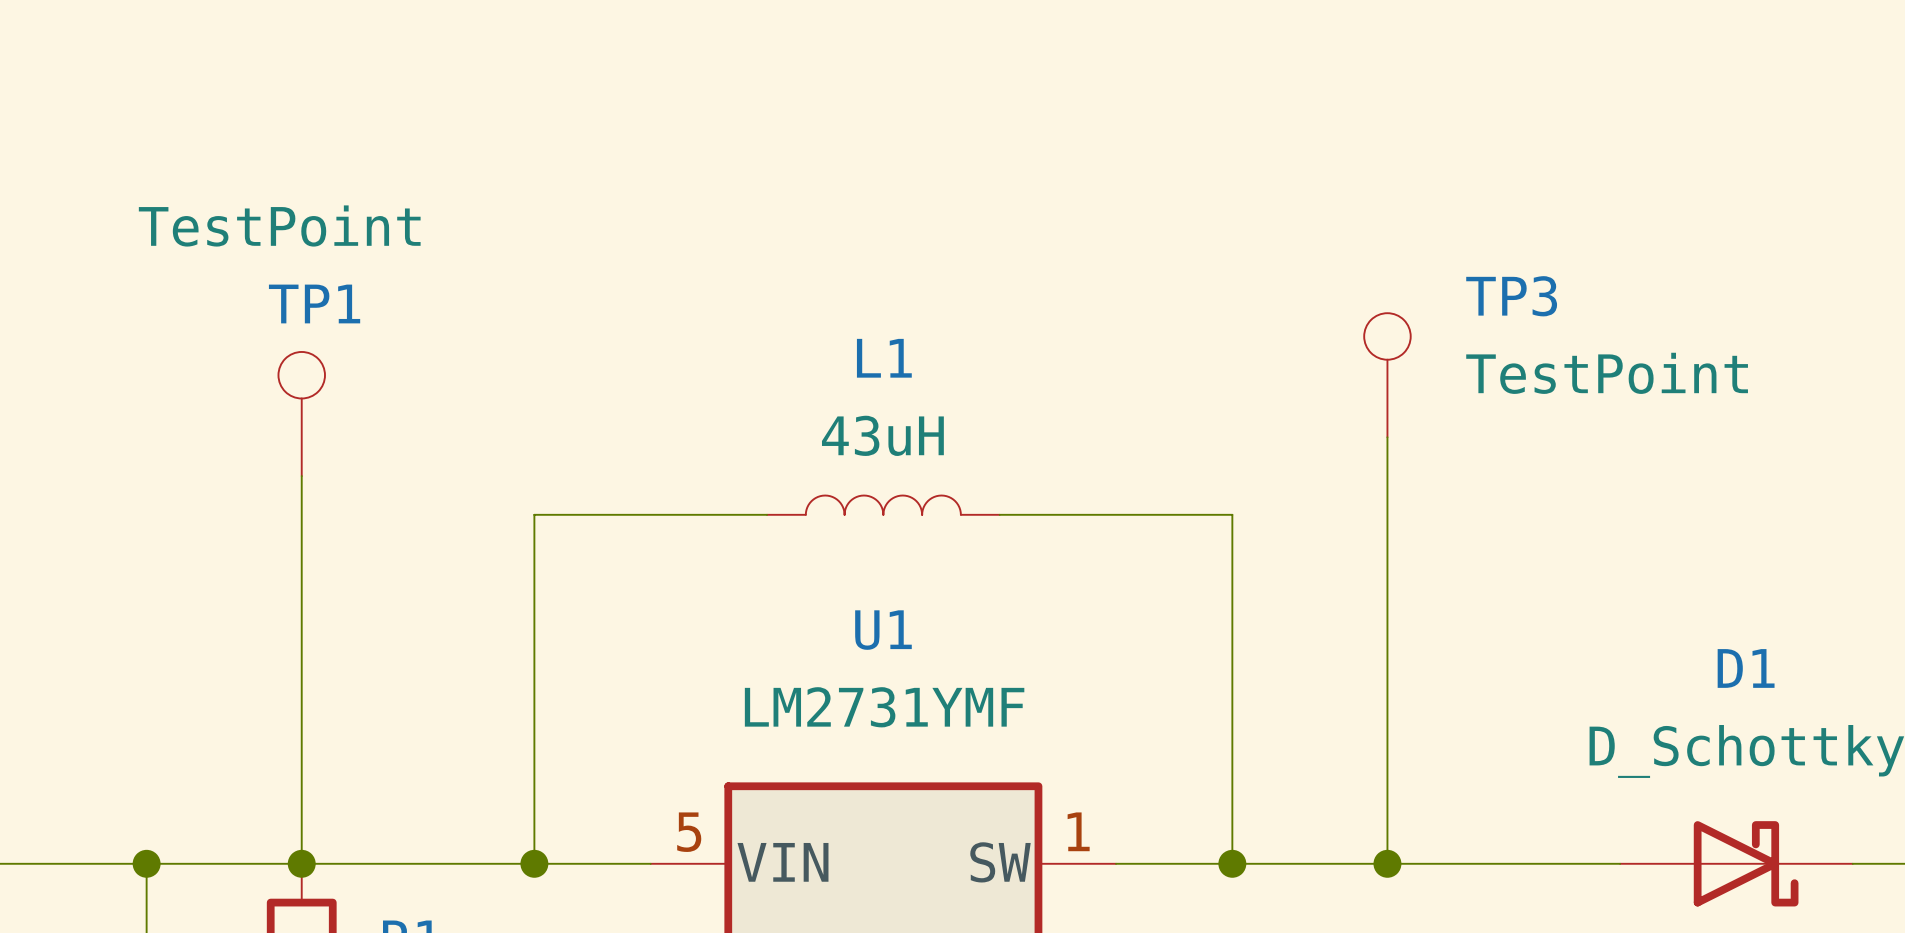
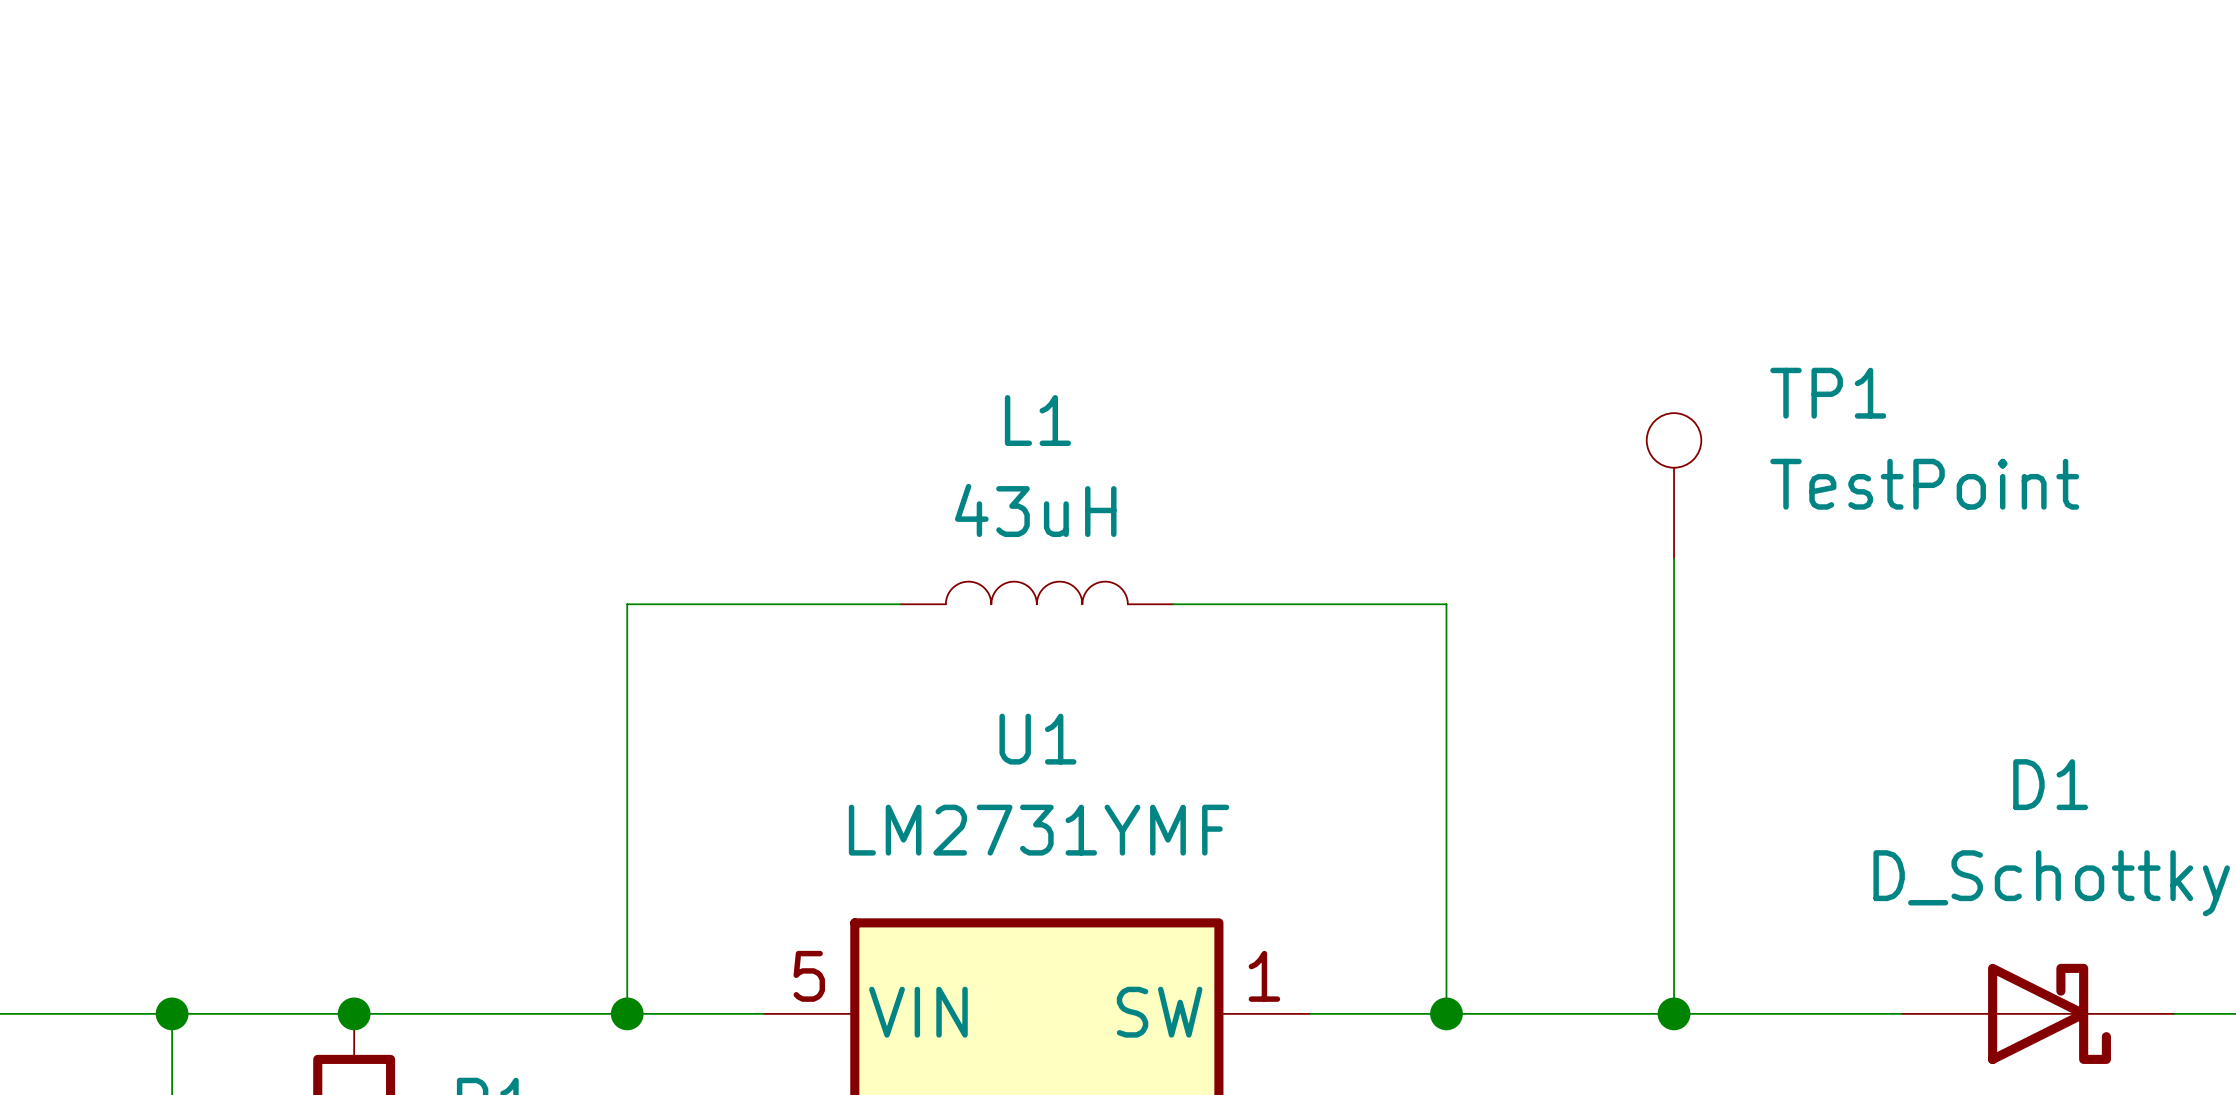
TP1 value position: TestPoint (279, 225) -> TestPoint (1924, 484)
TP1 name position: TP1 (314, 303) -> TP1 (1828, 393)
TP3: TestPoint (1387, 375) -> none
TP1 position: (301, 414) -> (1674, 485)
wire: (1387, 437) (1387, 863) -> none
wire: (301, 476) (301, 863) -> none
wire: none -> (1674, 558) (1674, 1013)
junction position: (1387, 863) -> (1674, 1013)

